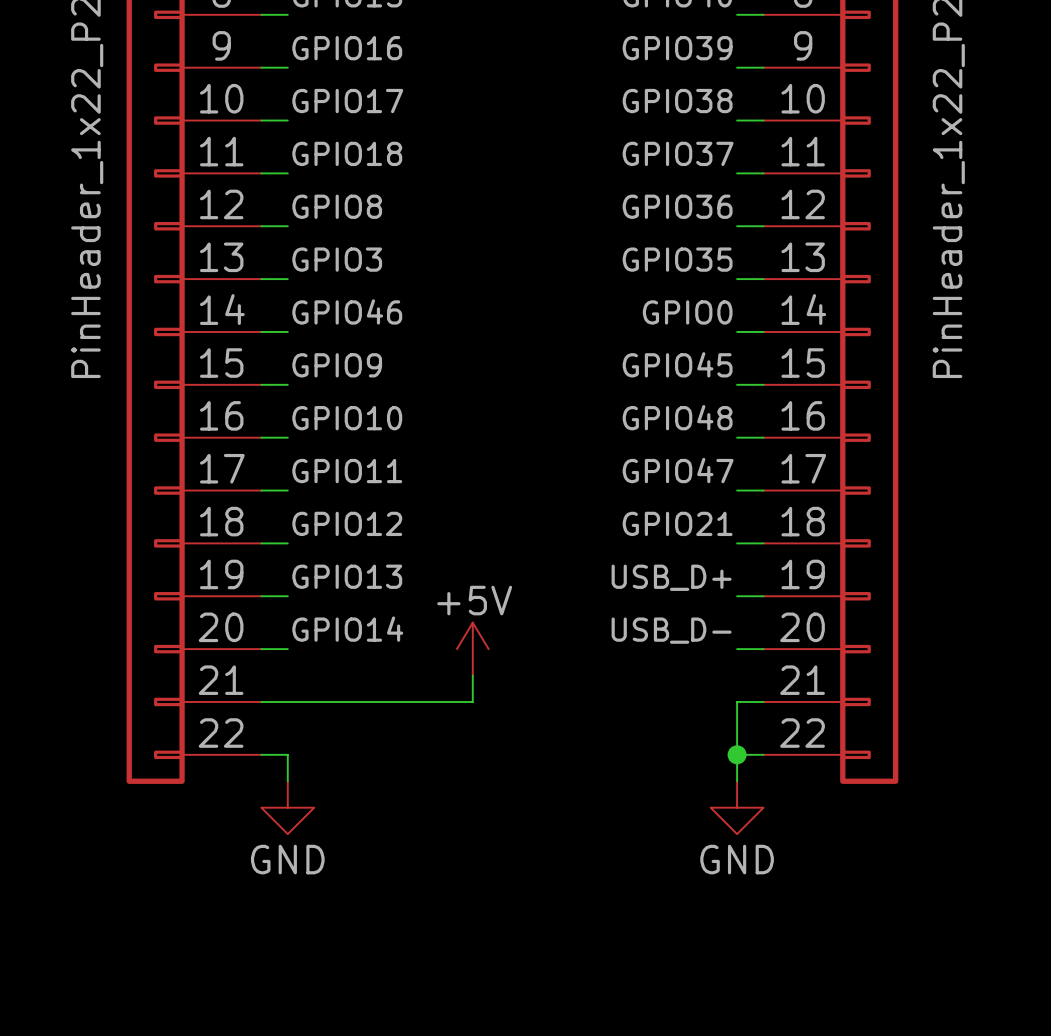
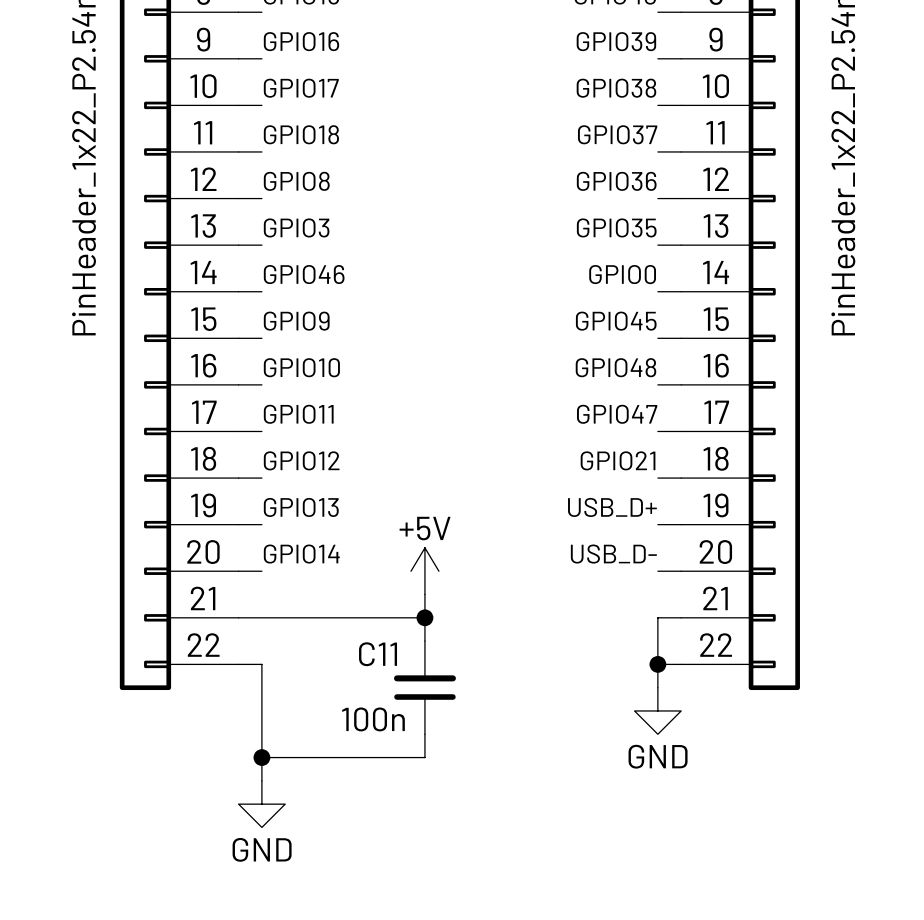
wire: none -> (424, 617) (424, 641)
junction: none -> (424, 617)
wire: none -> (261, 687) (261, 780)
C11: none -> 100n (424, 687)
power symbol position: GND (287, 807) -> GND (261, 804)
wire: none -> (424, 734) (424, 757) (261, 757)
junction: none -> (261, 757)

